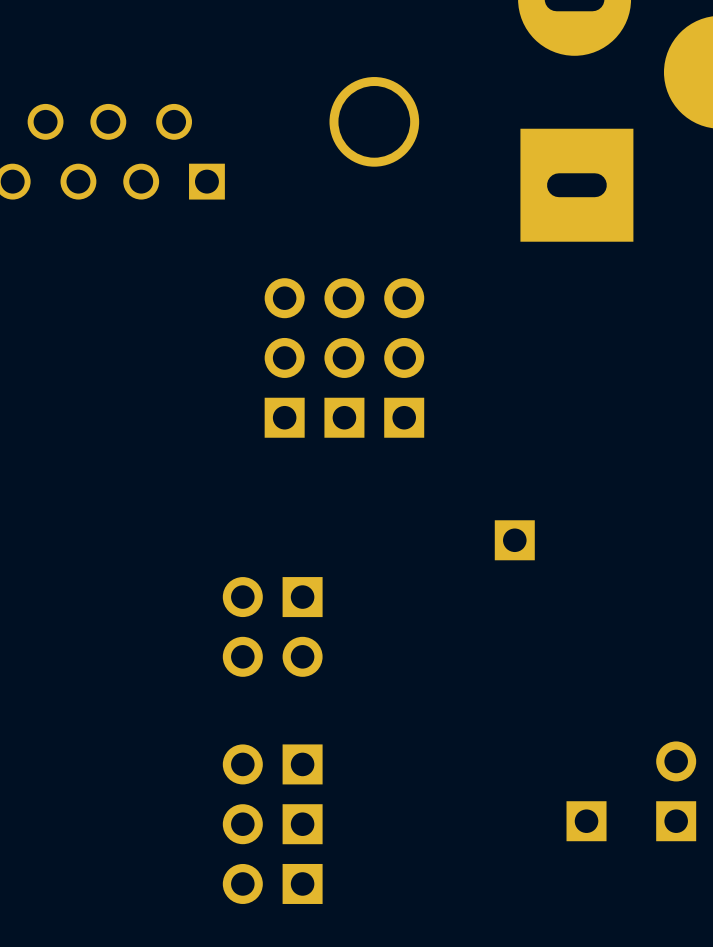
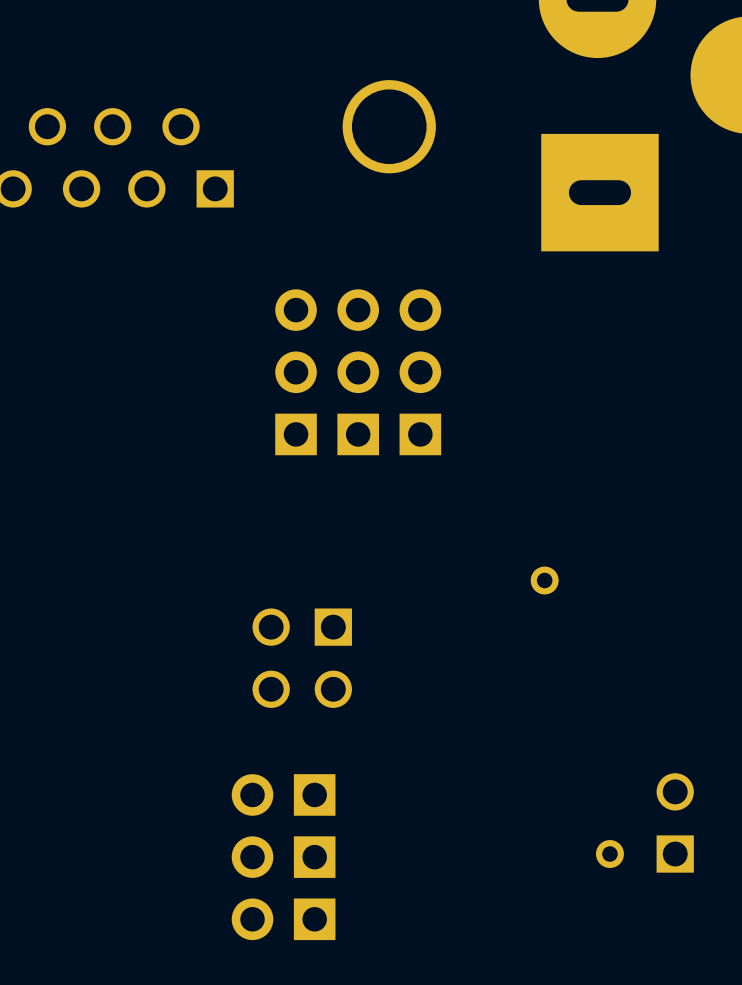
part footprint: [494, 520, 535, 561] -> [530, 566, 559, 595]
part footprint: [222, 577, 323, 677] -> [252, 608, 352, 708]
part: none -> (675, 822)
part: (676, 791) -> none
part footprint: [566, 801, 607, 842] -> [595, 840, 624, 869]

